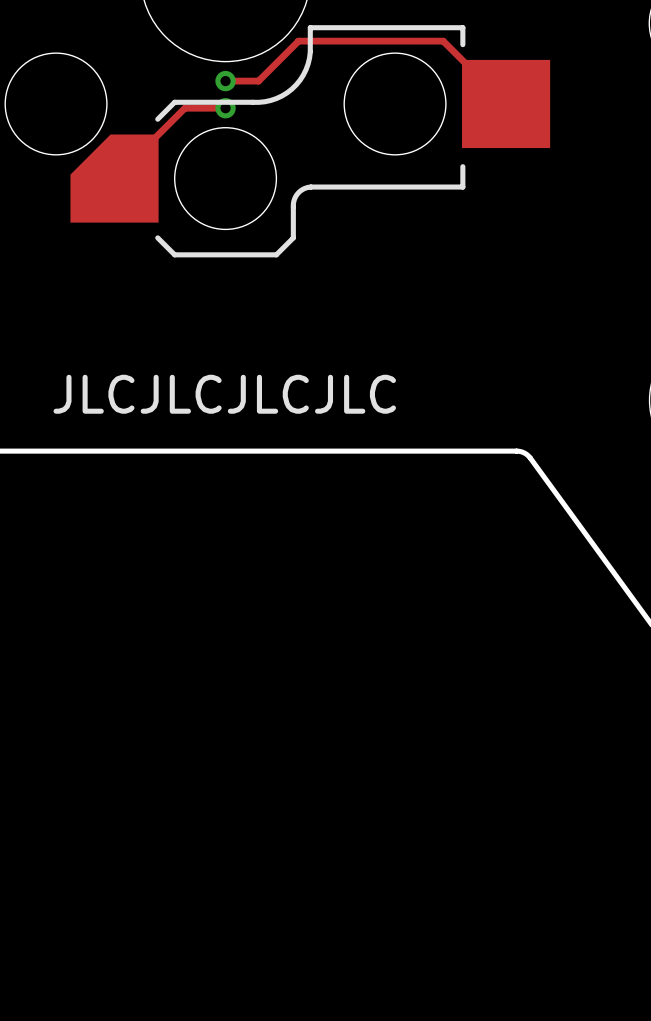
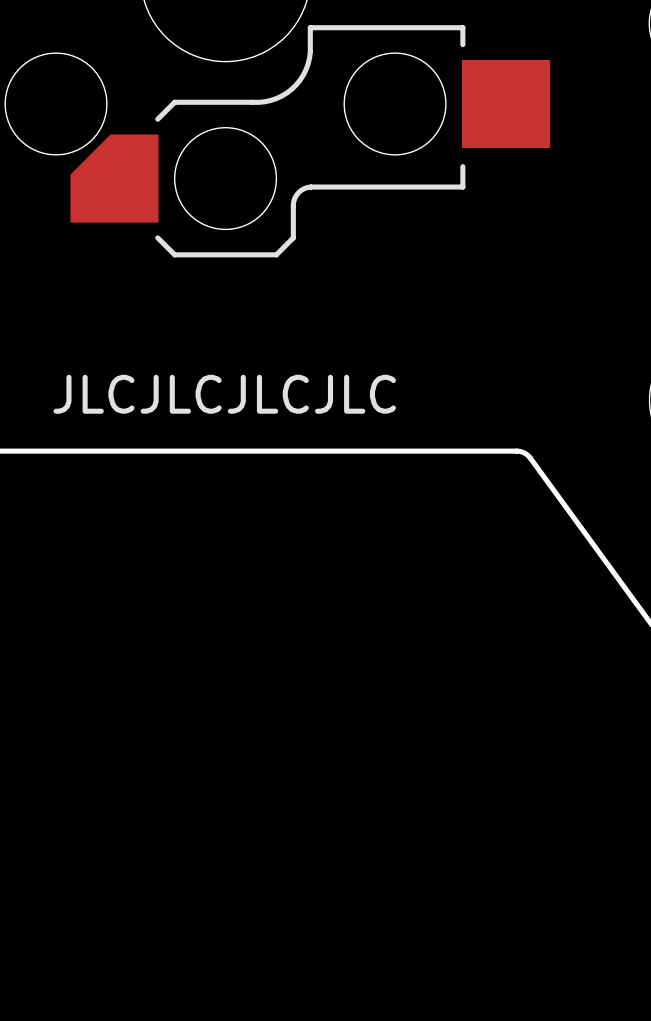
track: (225, 81) (258, 81) (298, 41) (443, 41) (506, 103) -> none
via: (225, 81) -> none
track: (225, 108) (184, 108) (114, 178) -> none
via: (225, 108) -> none

